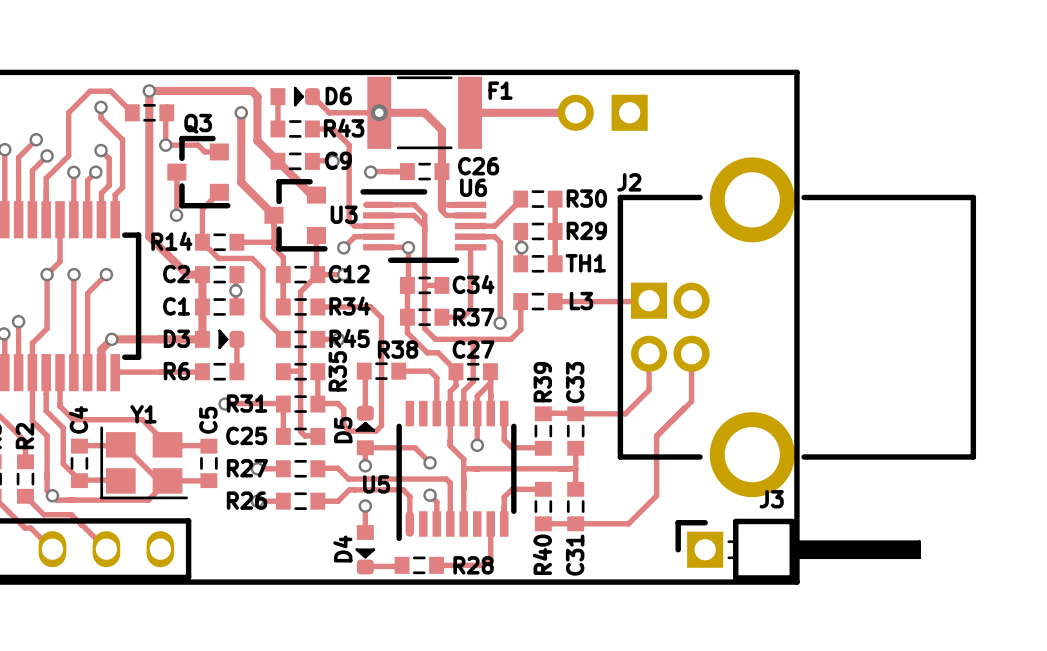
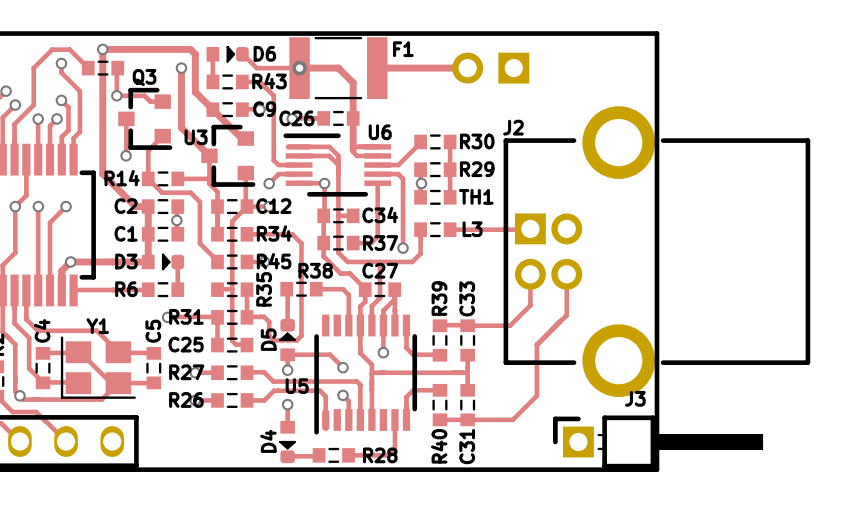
C26 name position: C26 (478, 166) -> C26 (296, 118)
U3 name position: U3 (344, 214) -> U3 (196, 137)

